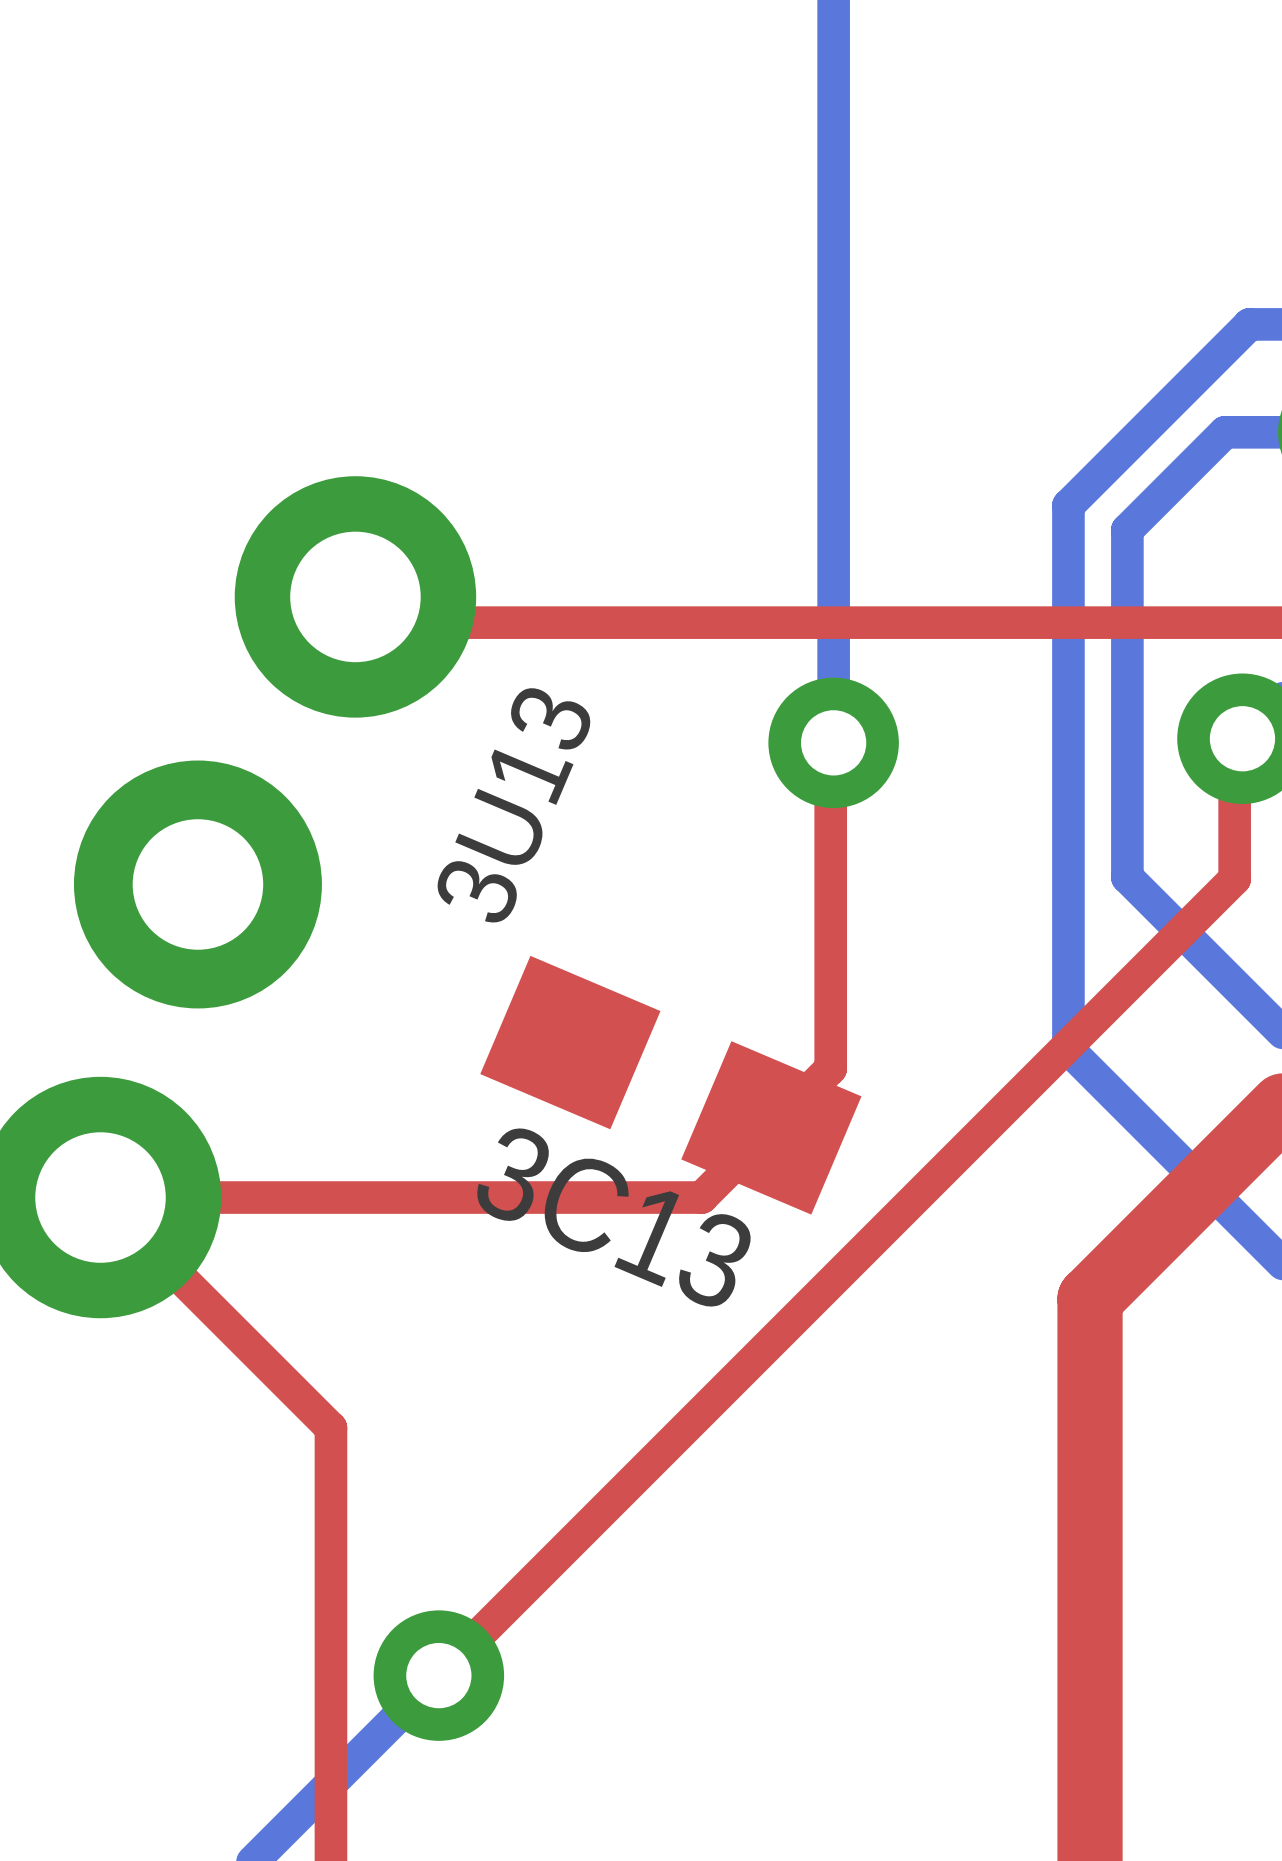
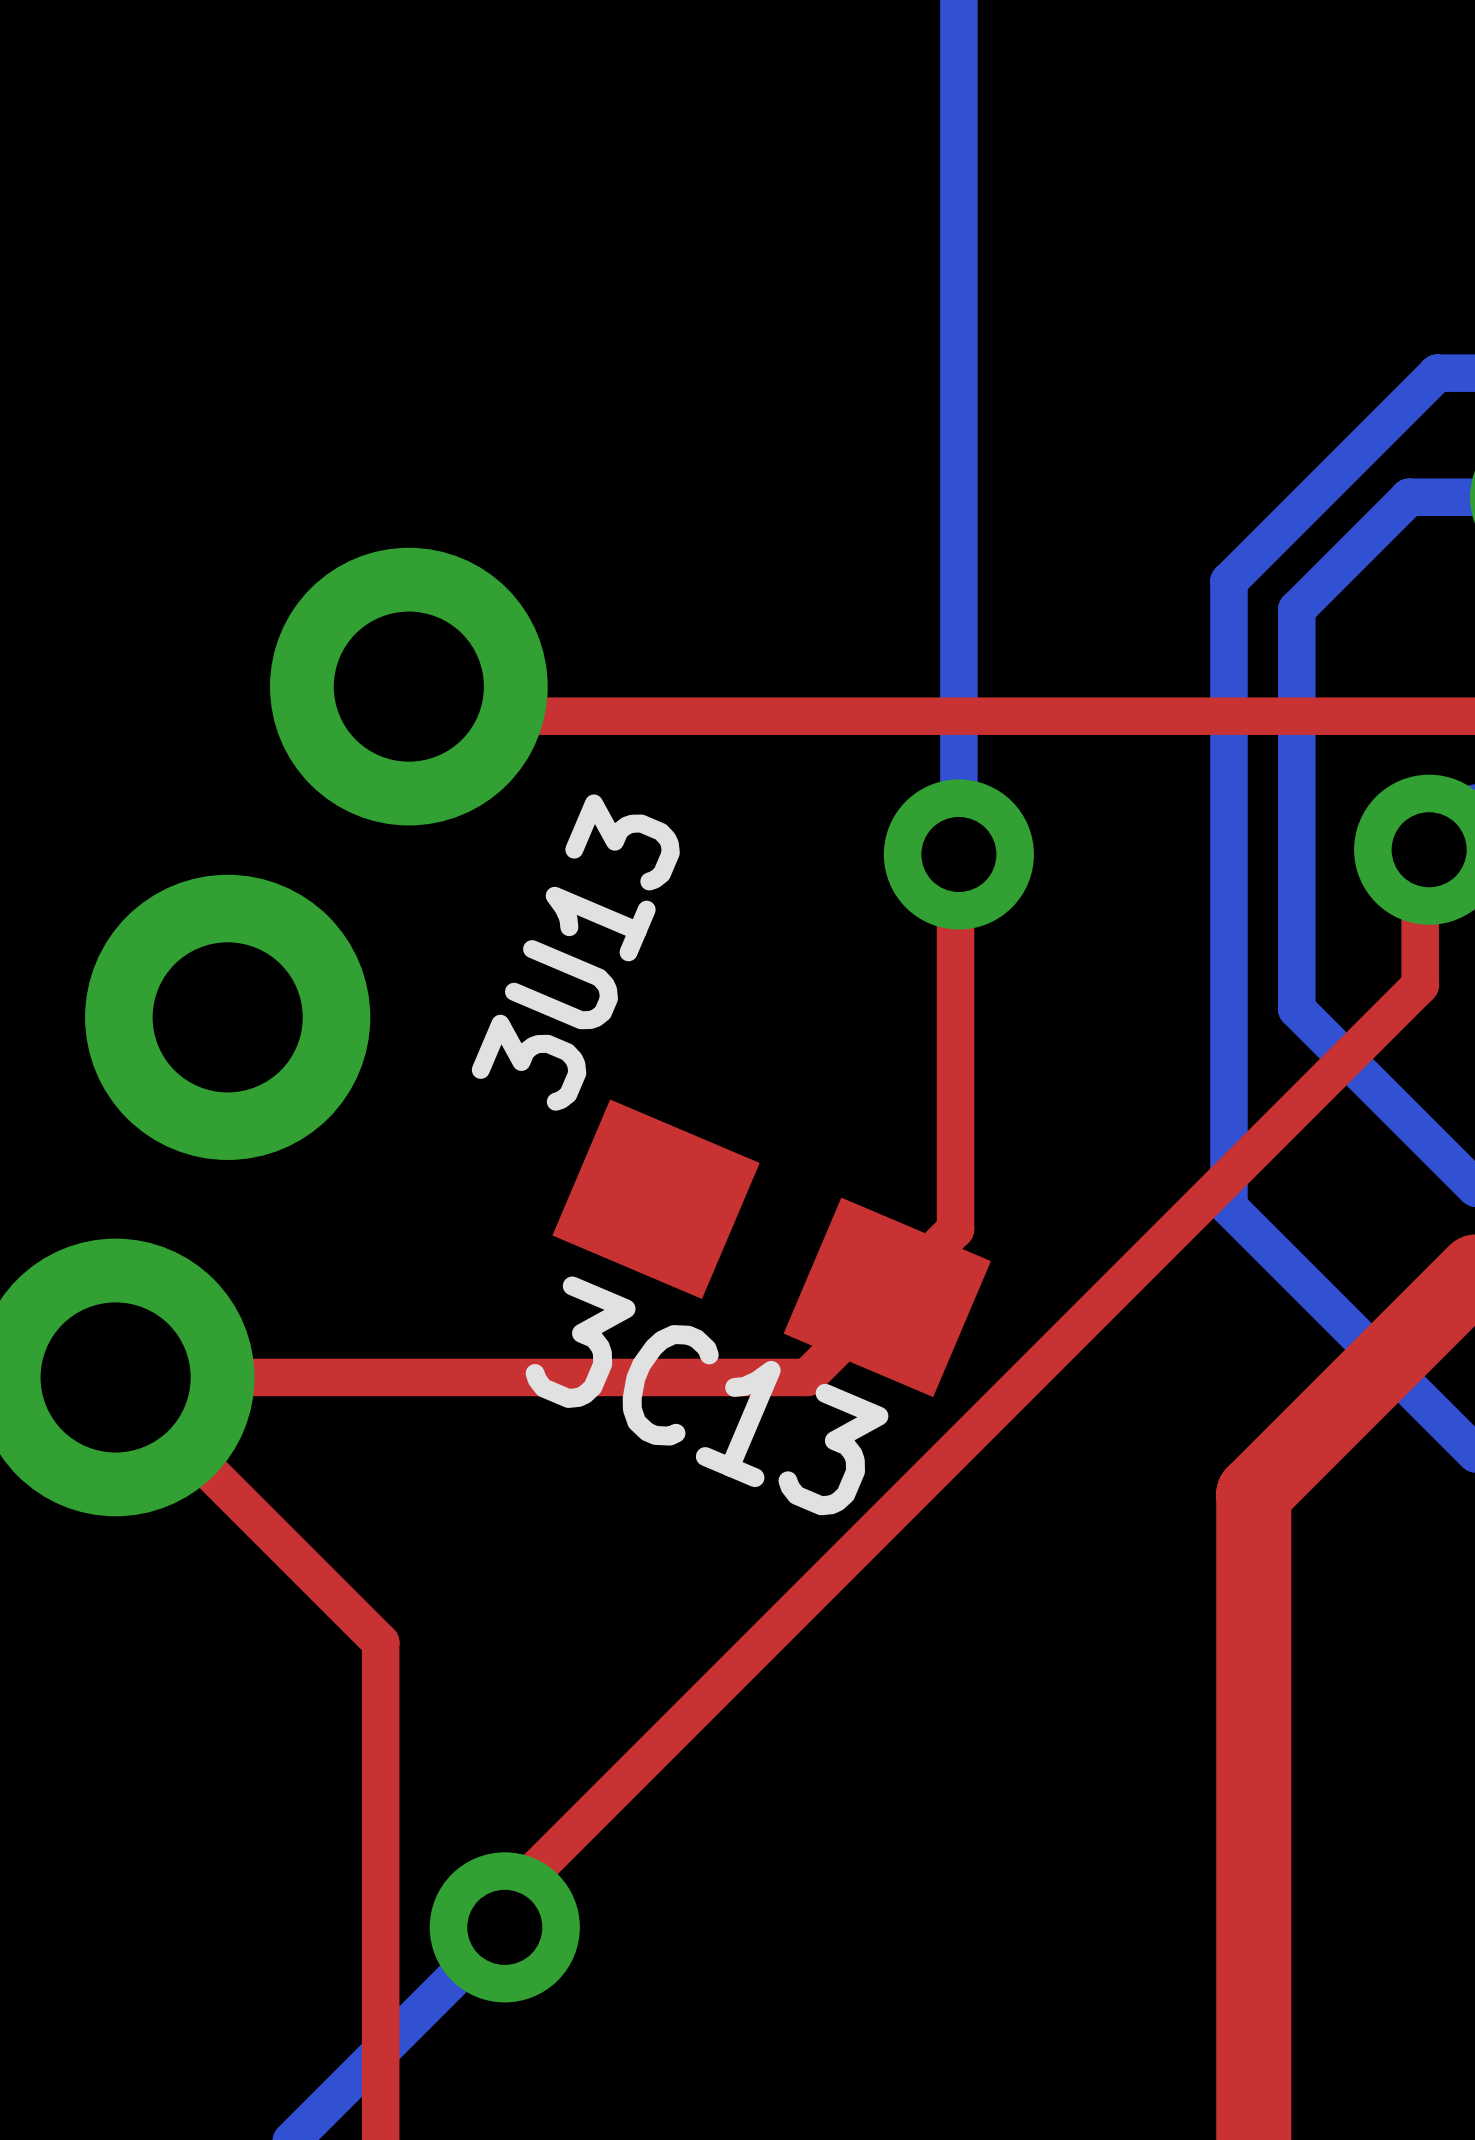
top track: (1234, 856) (1234, 879) (438, 1674) -> (1420, 985) (504, 1900) (504, 1926)

